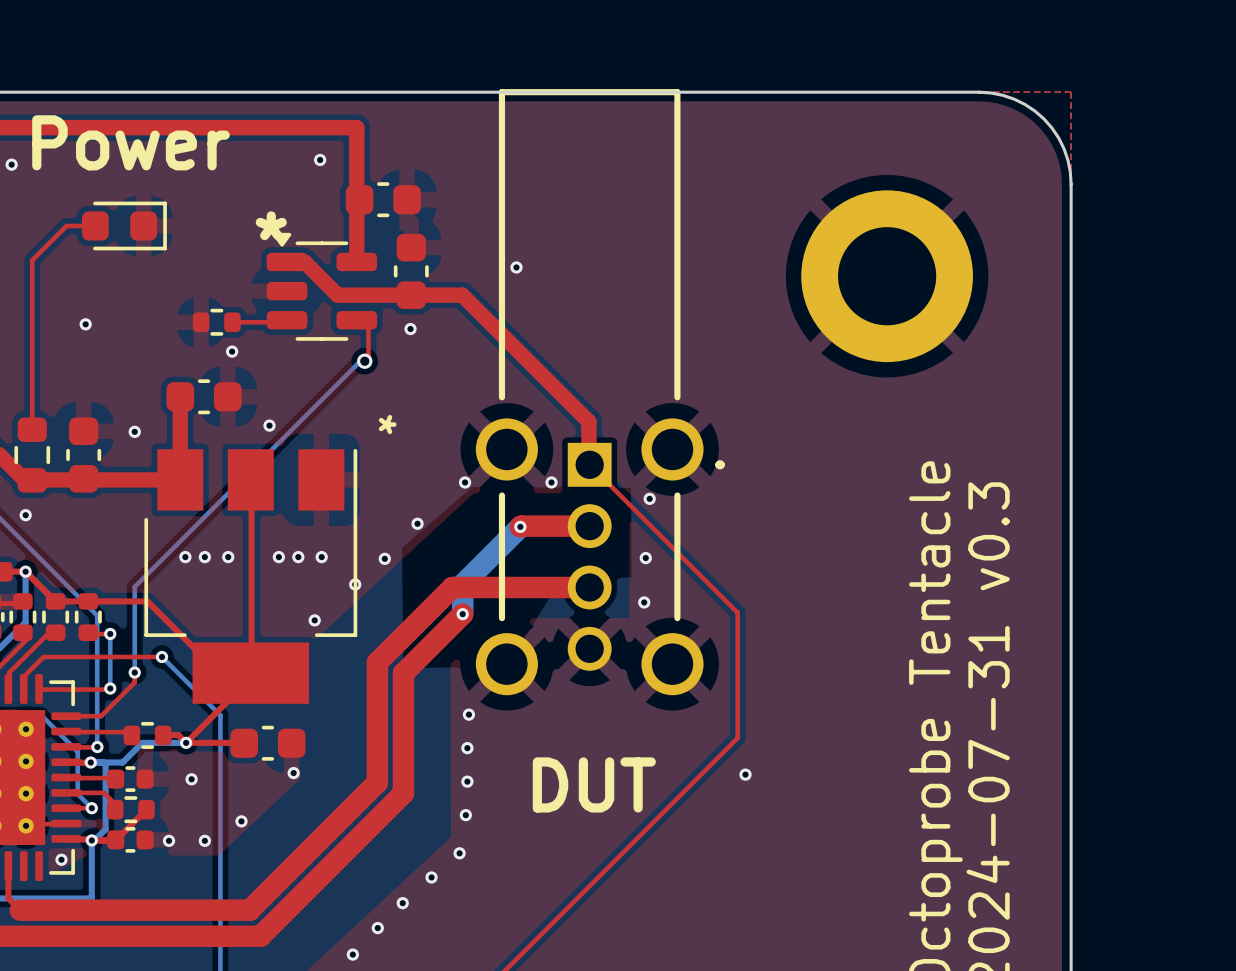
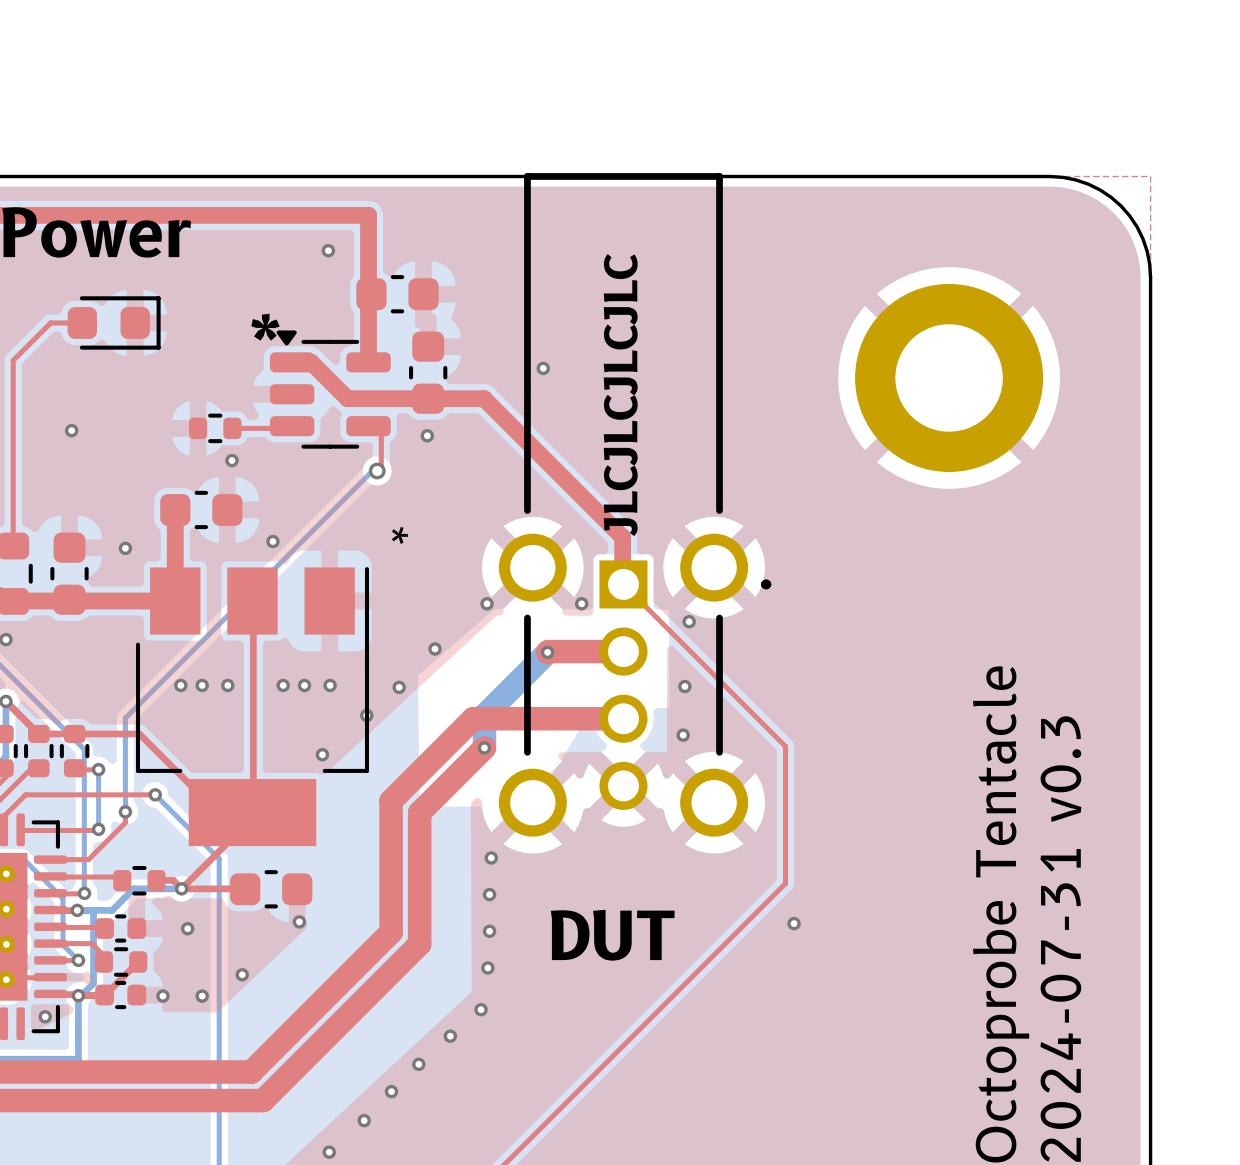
text: none -> JLCJLCJLCJLC (620, 395)

